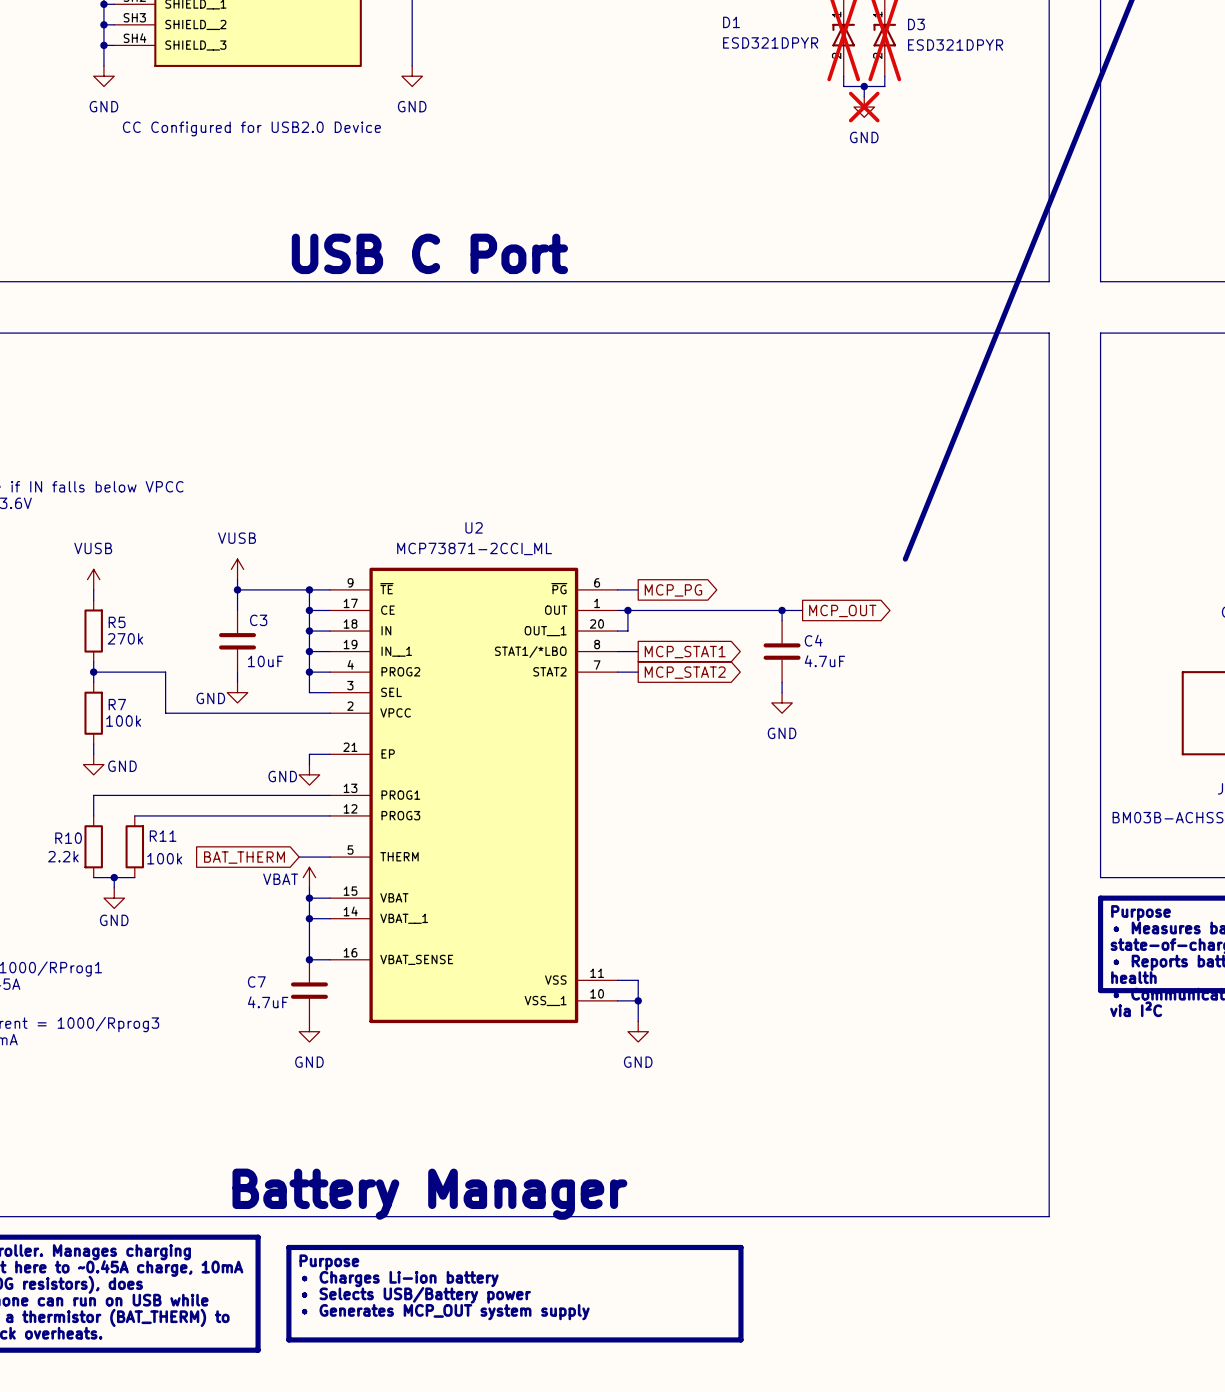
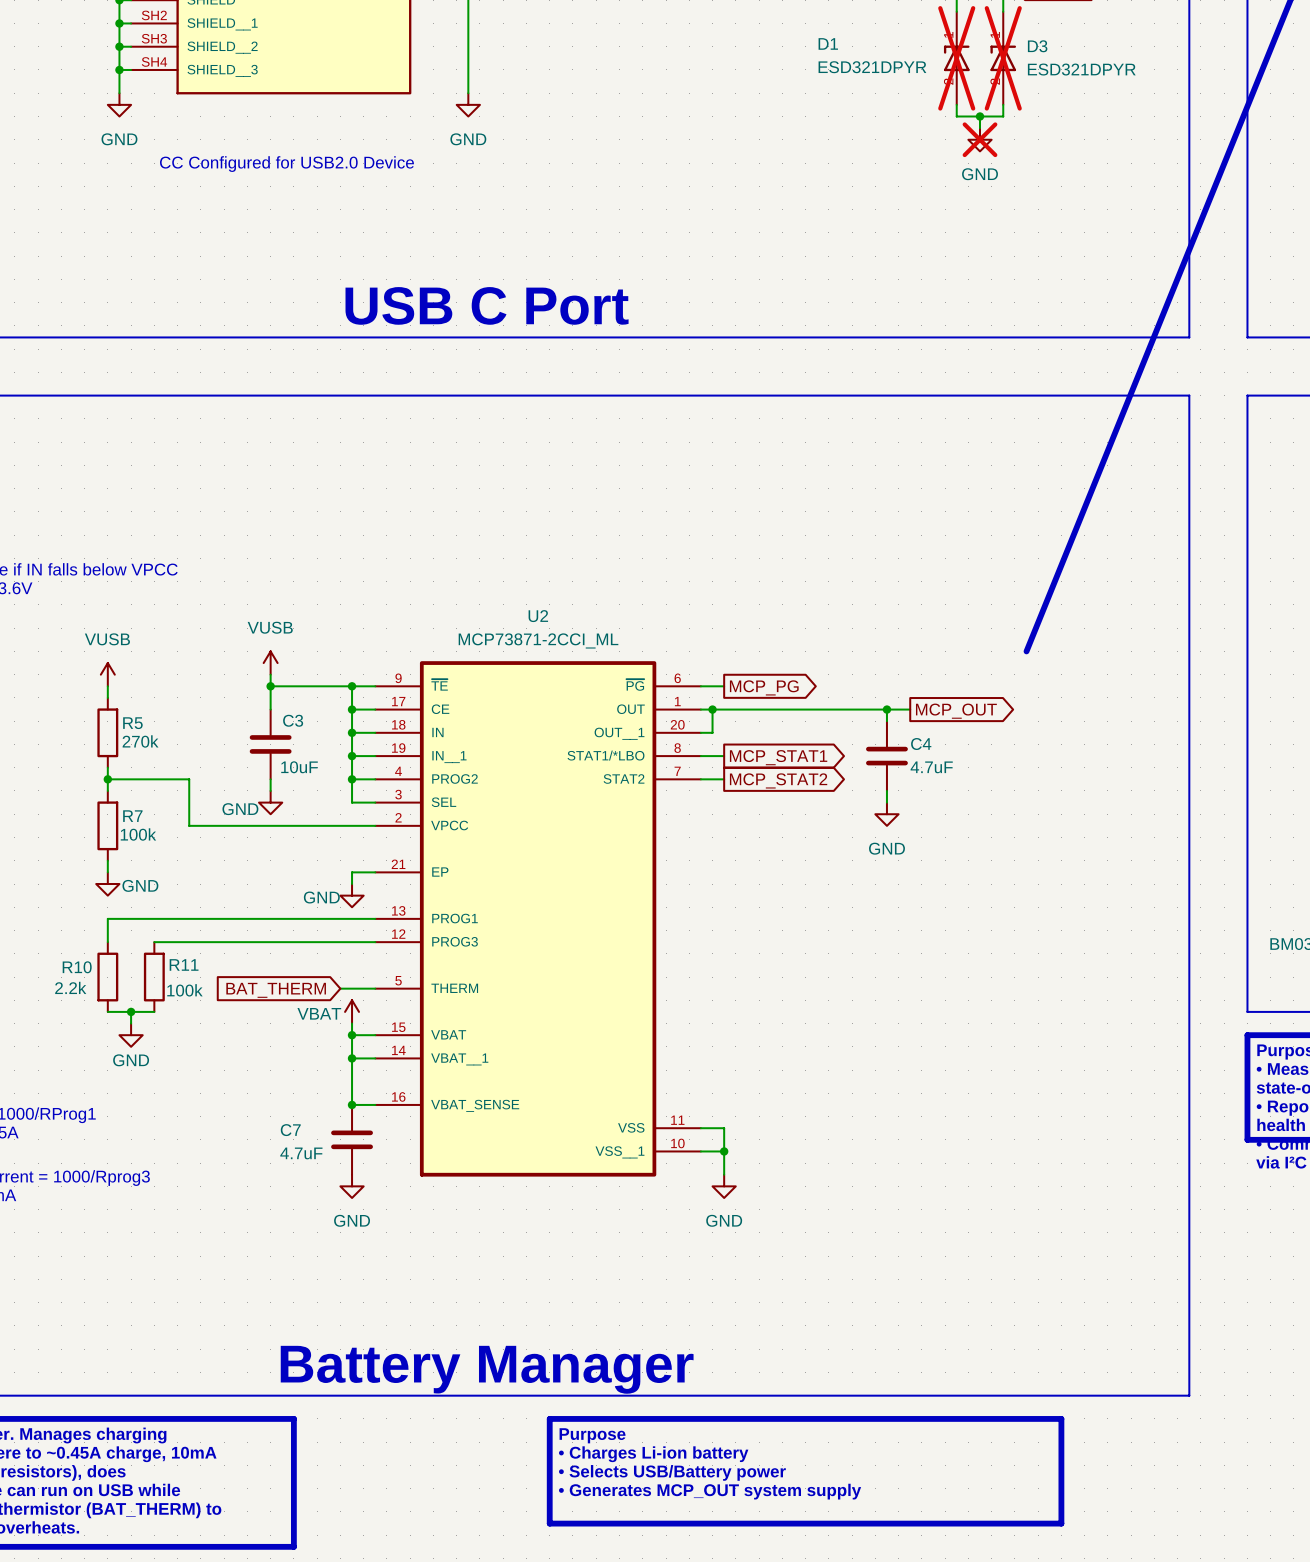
line: (288, 1247) (740, 1247) (740, 1339) (288, 1339) (288, 1247) -> (549, 1418) (1061, 1418) (1061, 1523) (549, 1523) (549, 1418)
text position: Purpose (329, 1262) -> Purpose (592, 1435)
text position: • Charges Li-ion battery (400, 1279) -> • Charges Li-ion battery (653, 1454)
text position: • Selects USB/Battery power (416, 1295) -> • Selects USB/Battery power (672, 1472)
text position: • Generates MCP_OUT system supply (445, 1312) -> • Generates MCP_OUT system supply (710, 1491)

